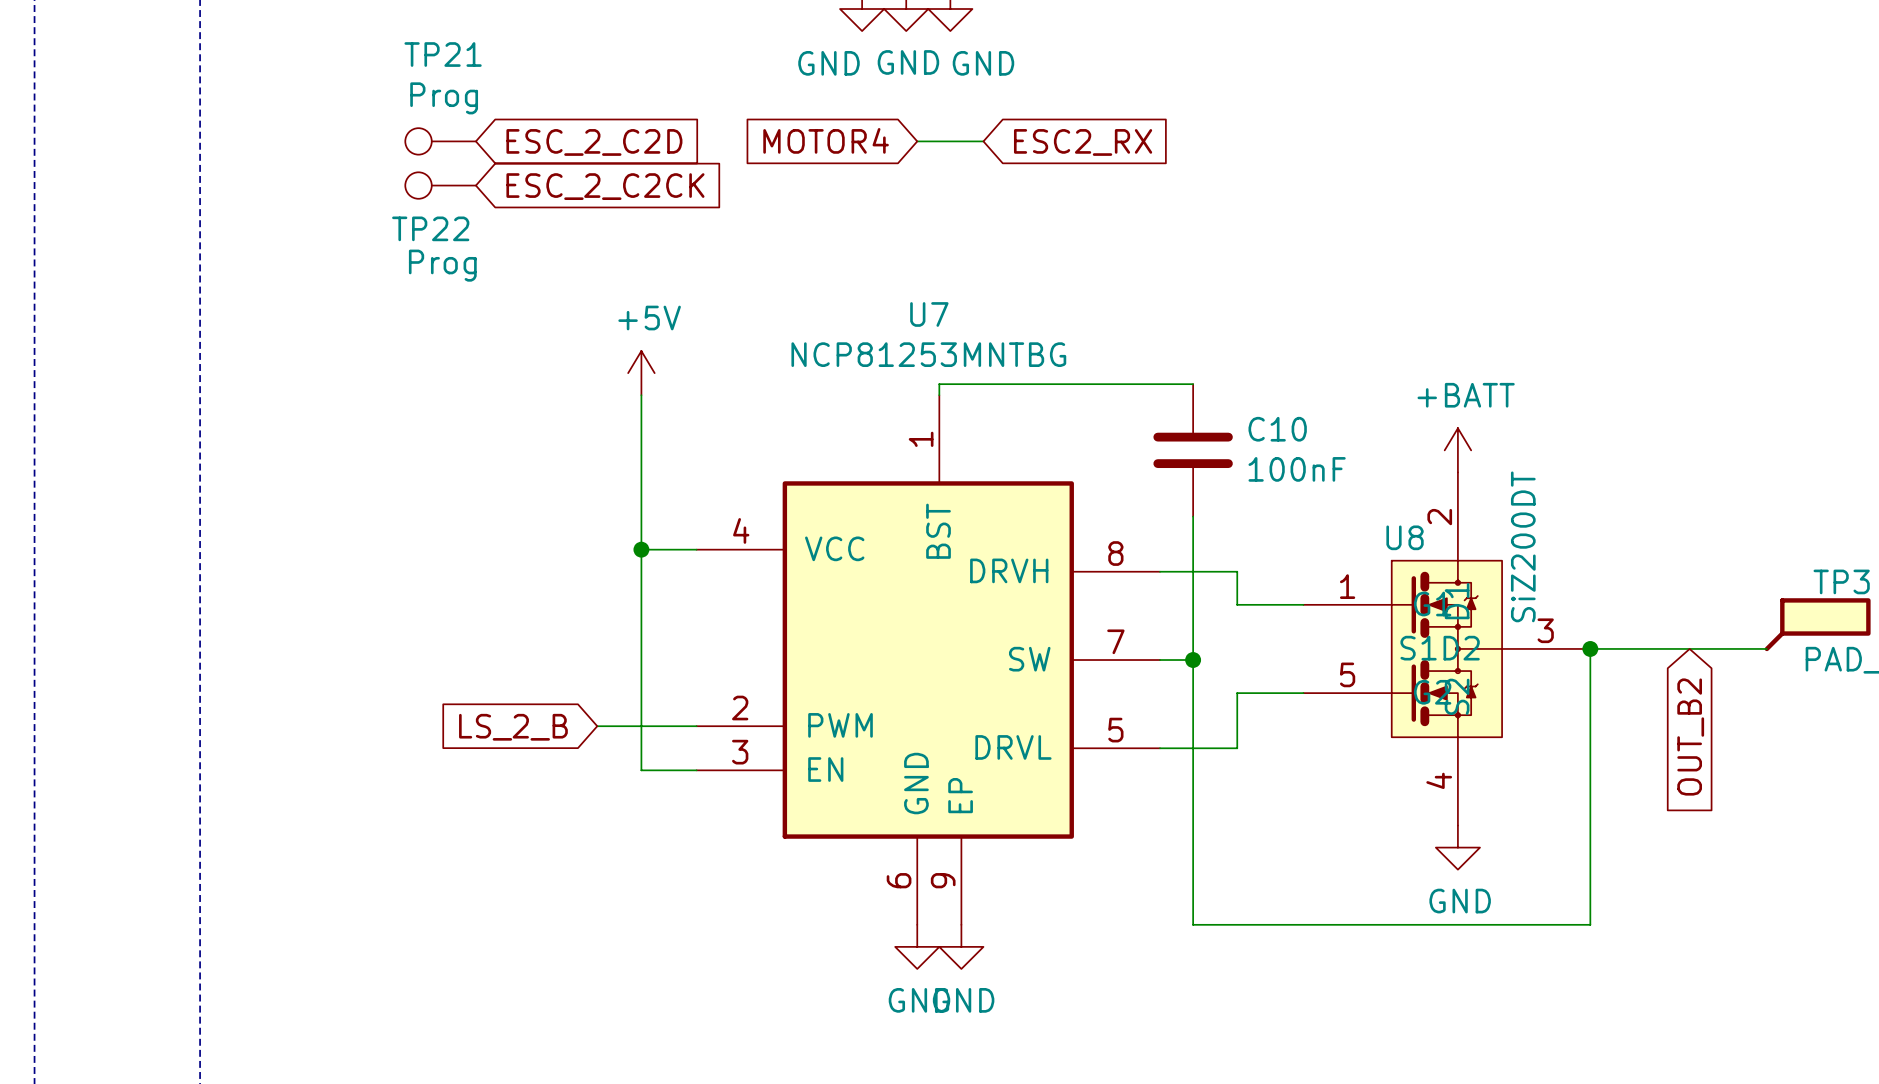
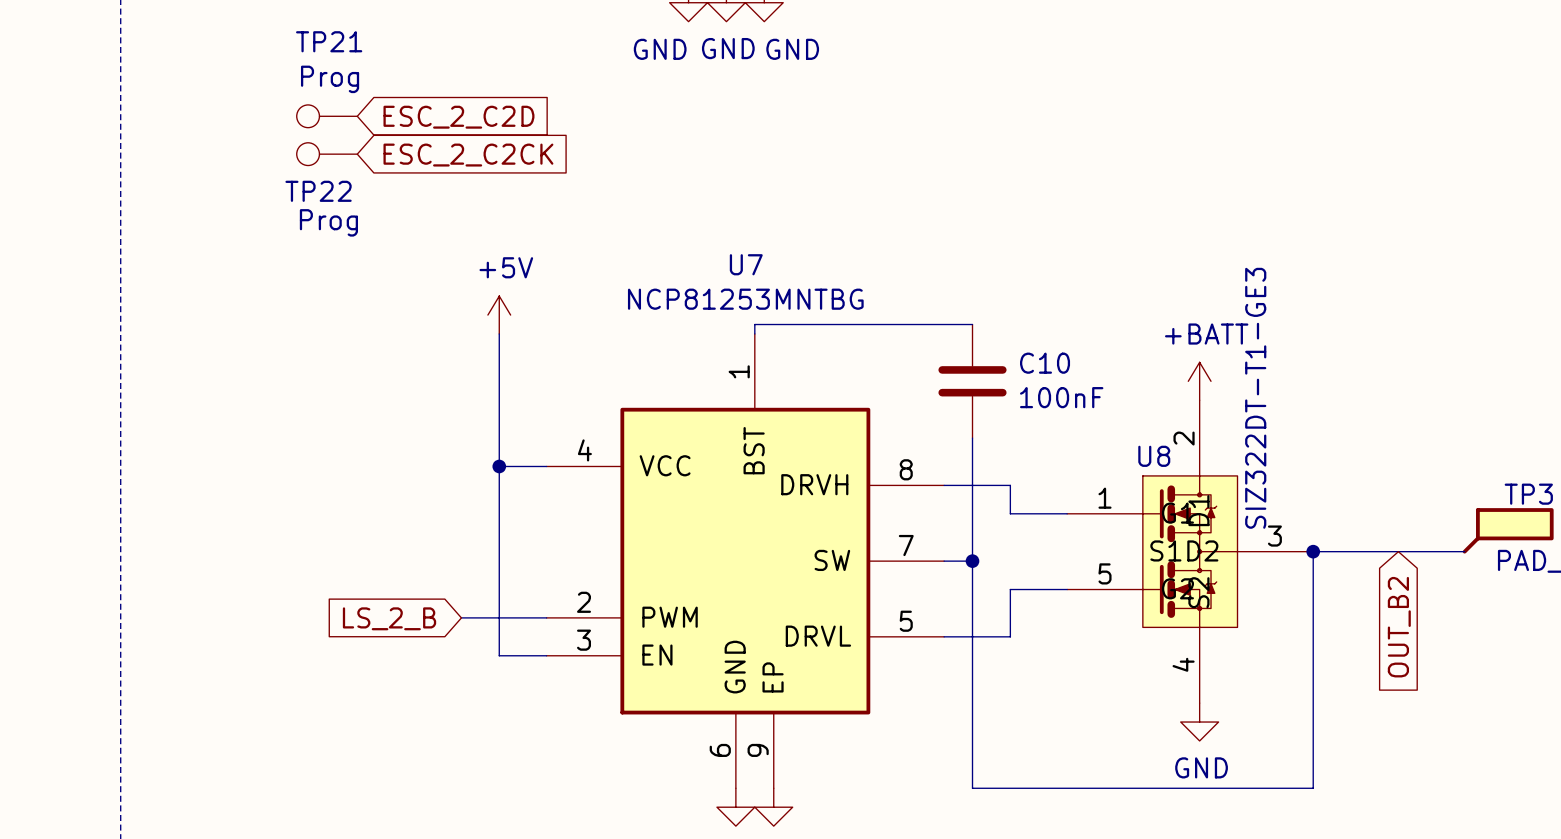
global label: MOTOR4 (826, 140) -> none
wire: (917, 141) (983, 141) -> none
global label: ESC2_RX (1083, 142) -> none
U8 value: SiZ200DT (1523, 546) -> SIZ322DT-T1-GE3 (1255, 398)

